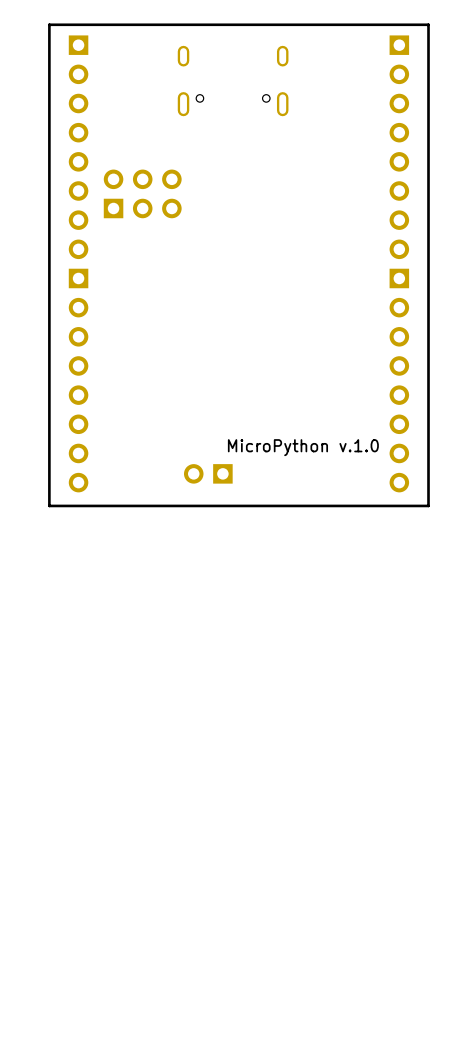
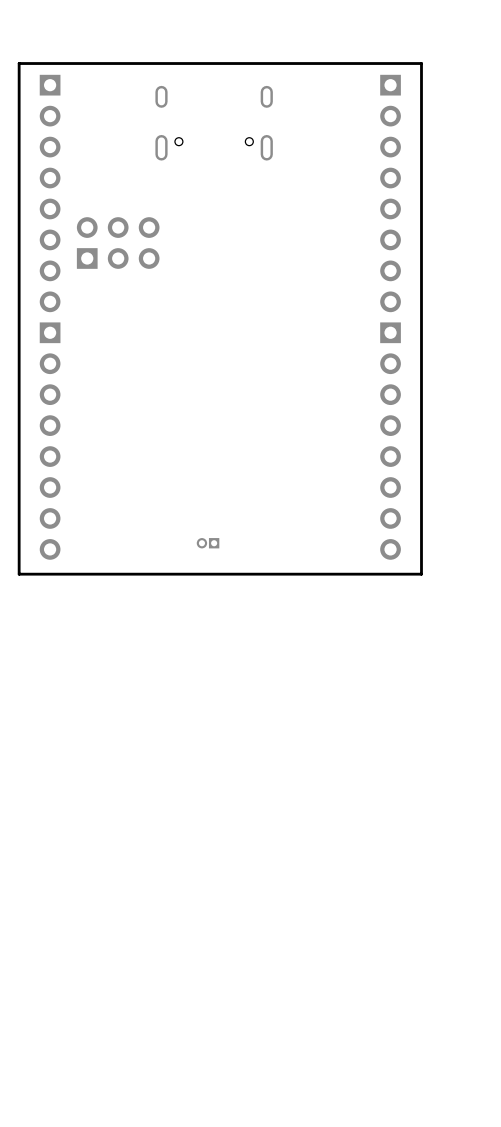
text: MicroPython v.1.0 (303, 447) -> none
part: (208, 473) -> none
part: none -> (208, 543)

